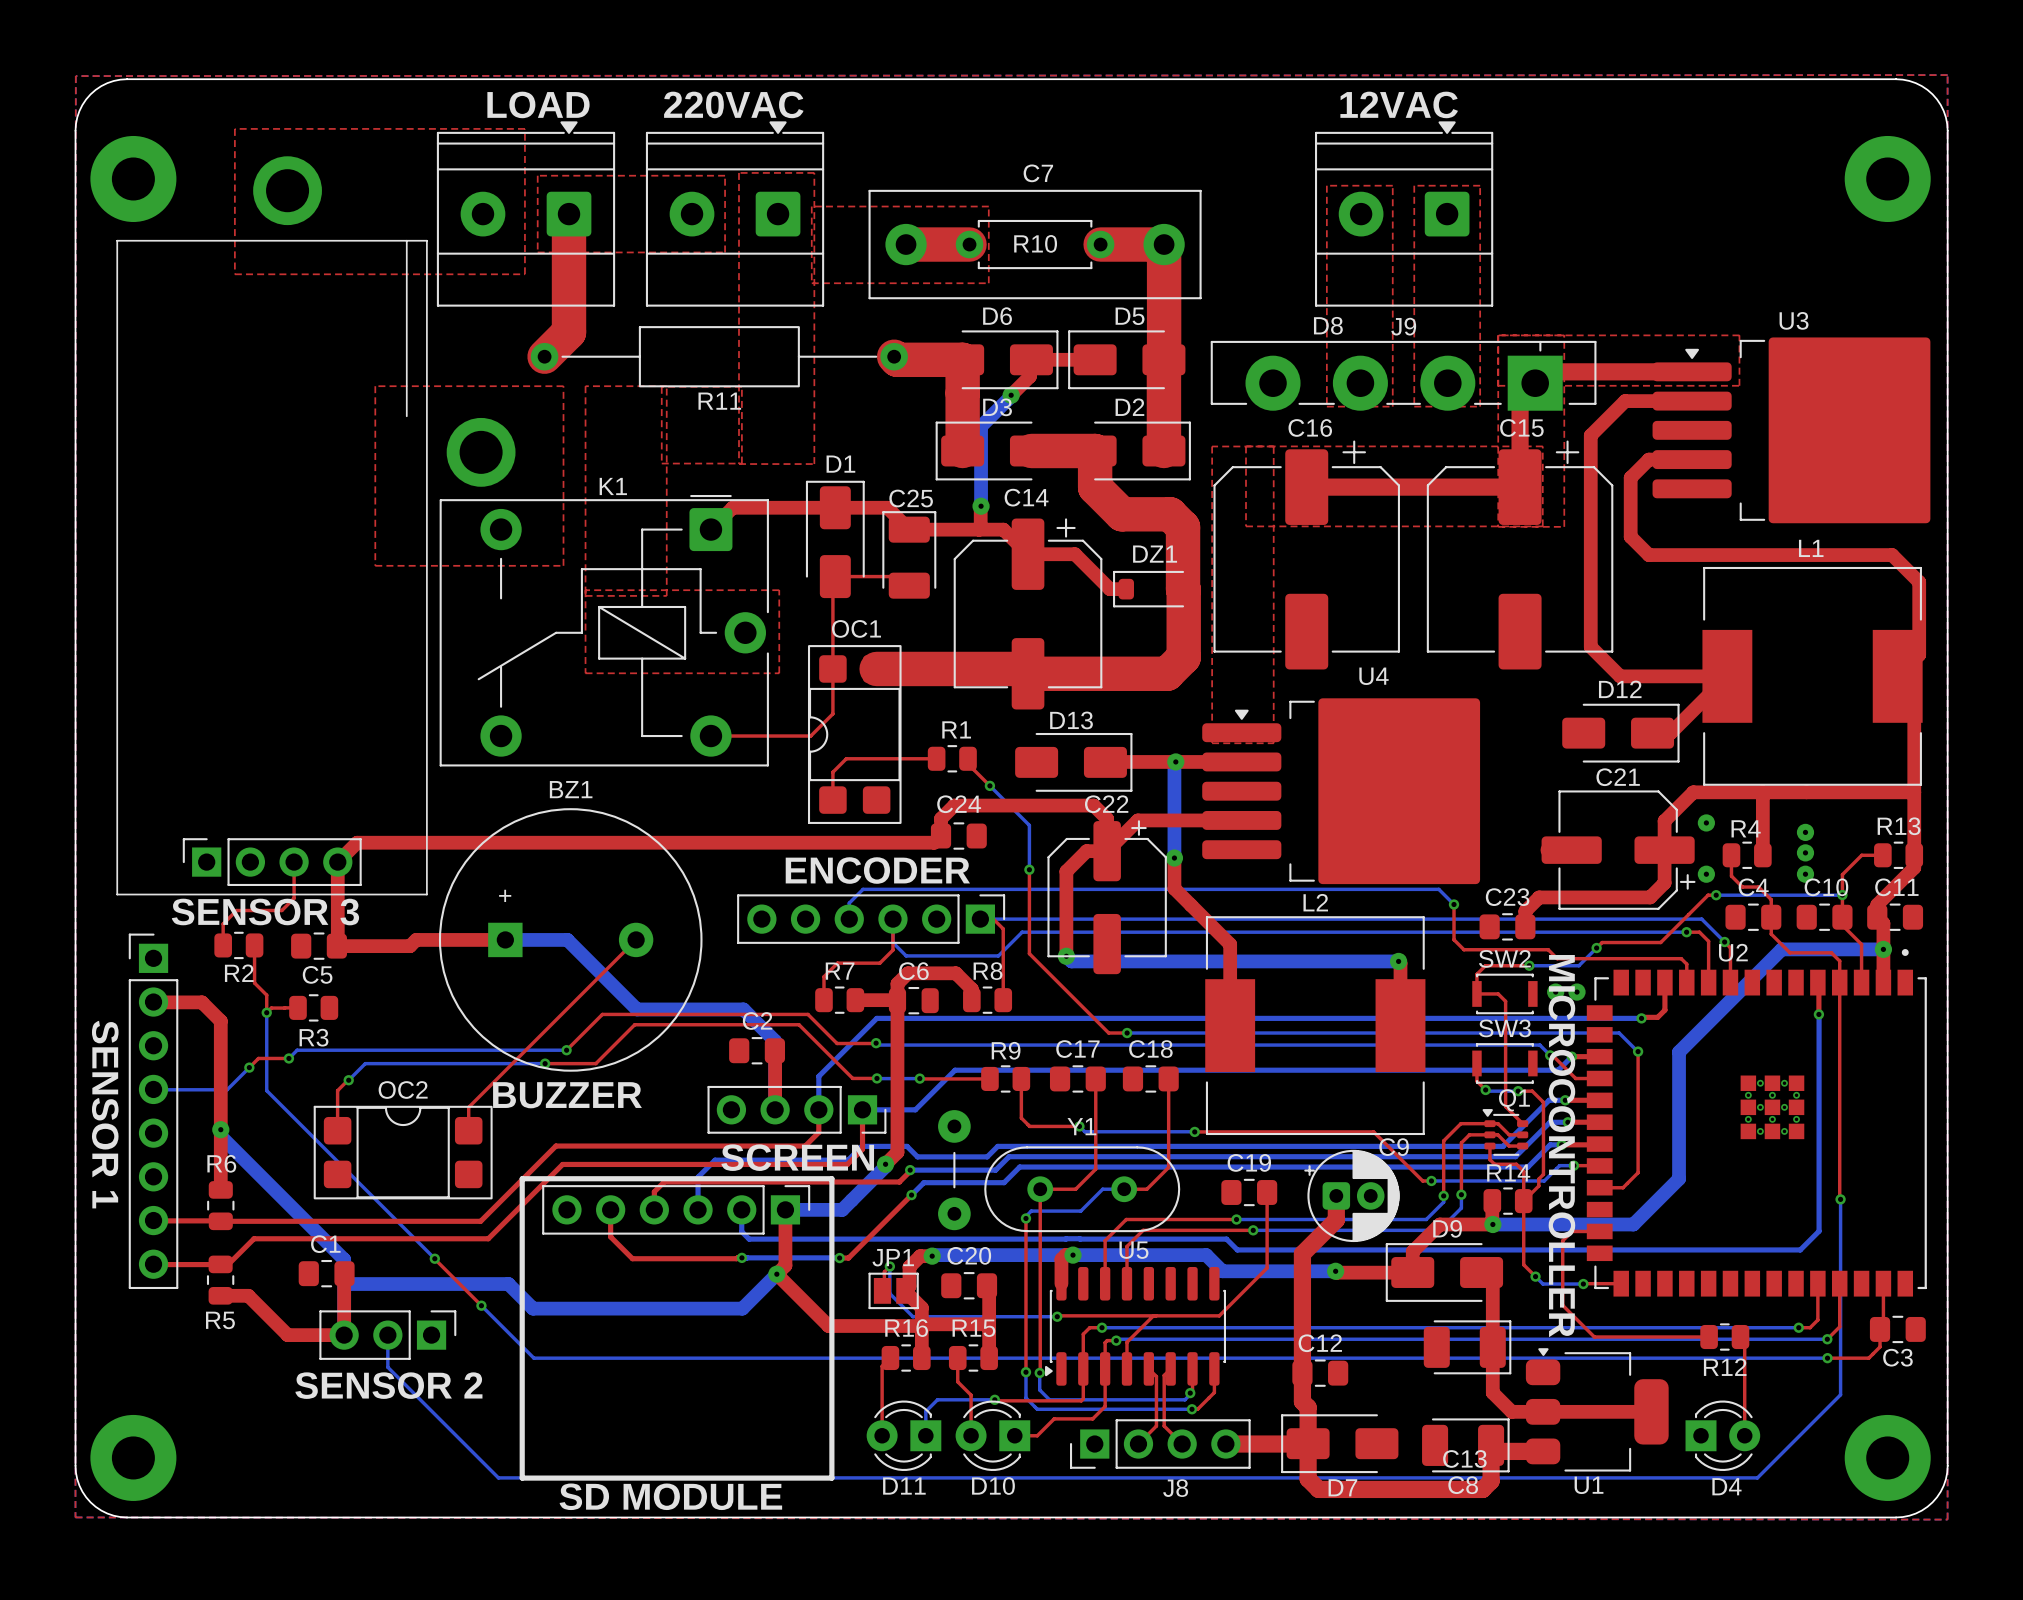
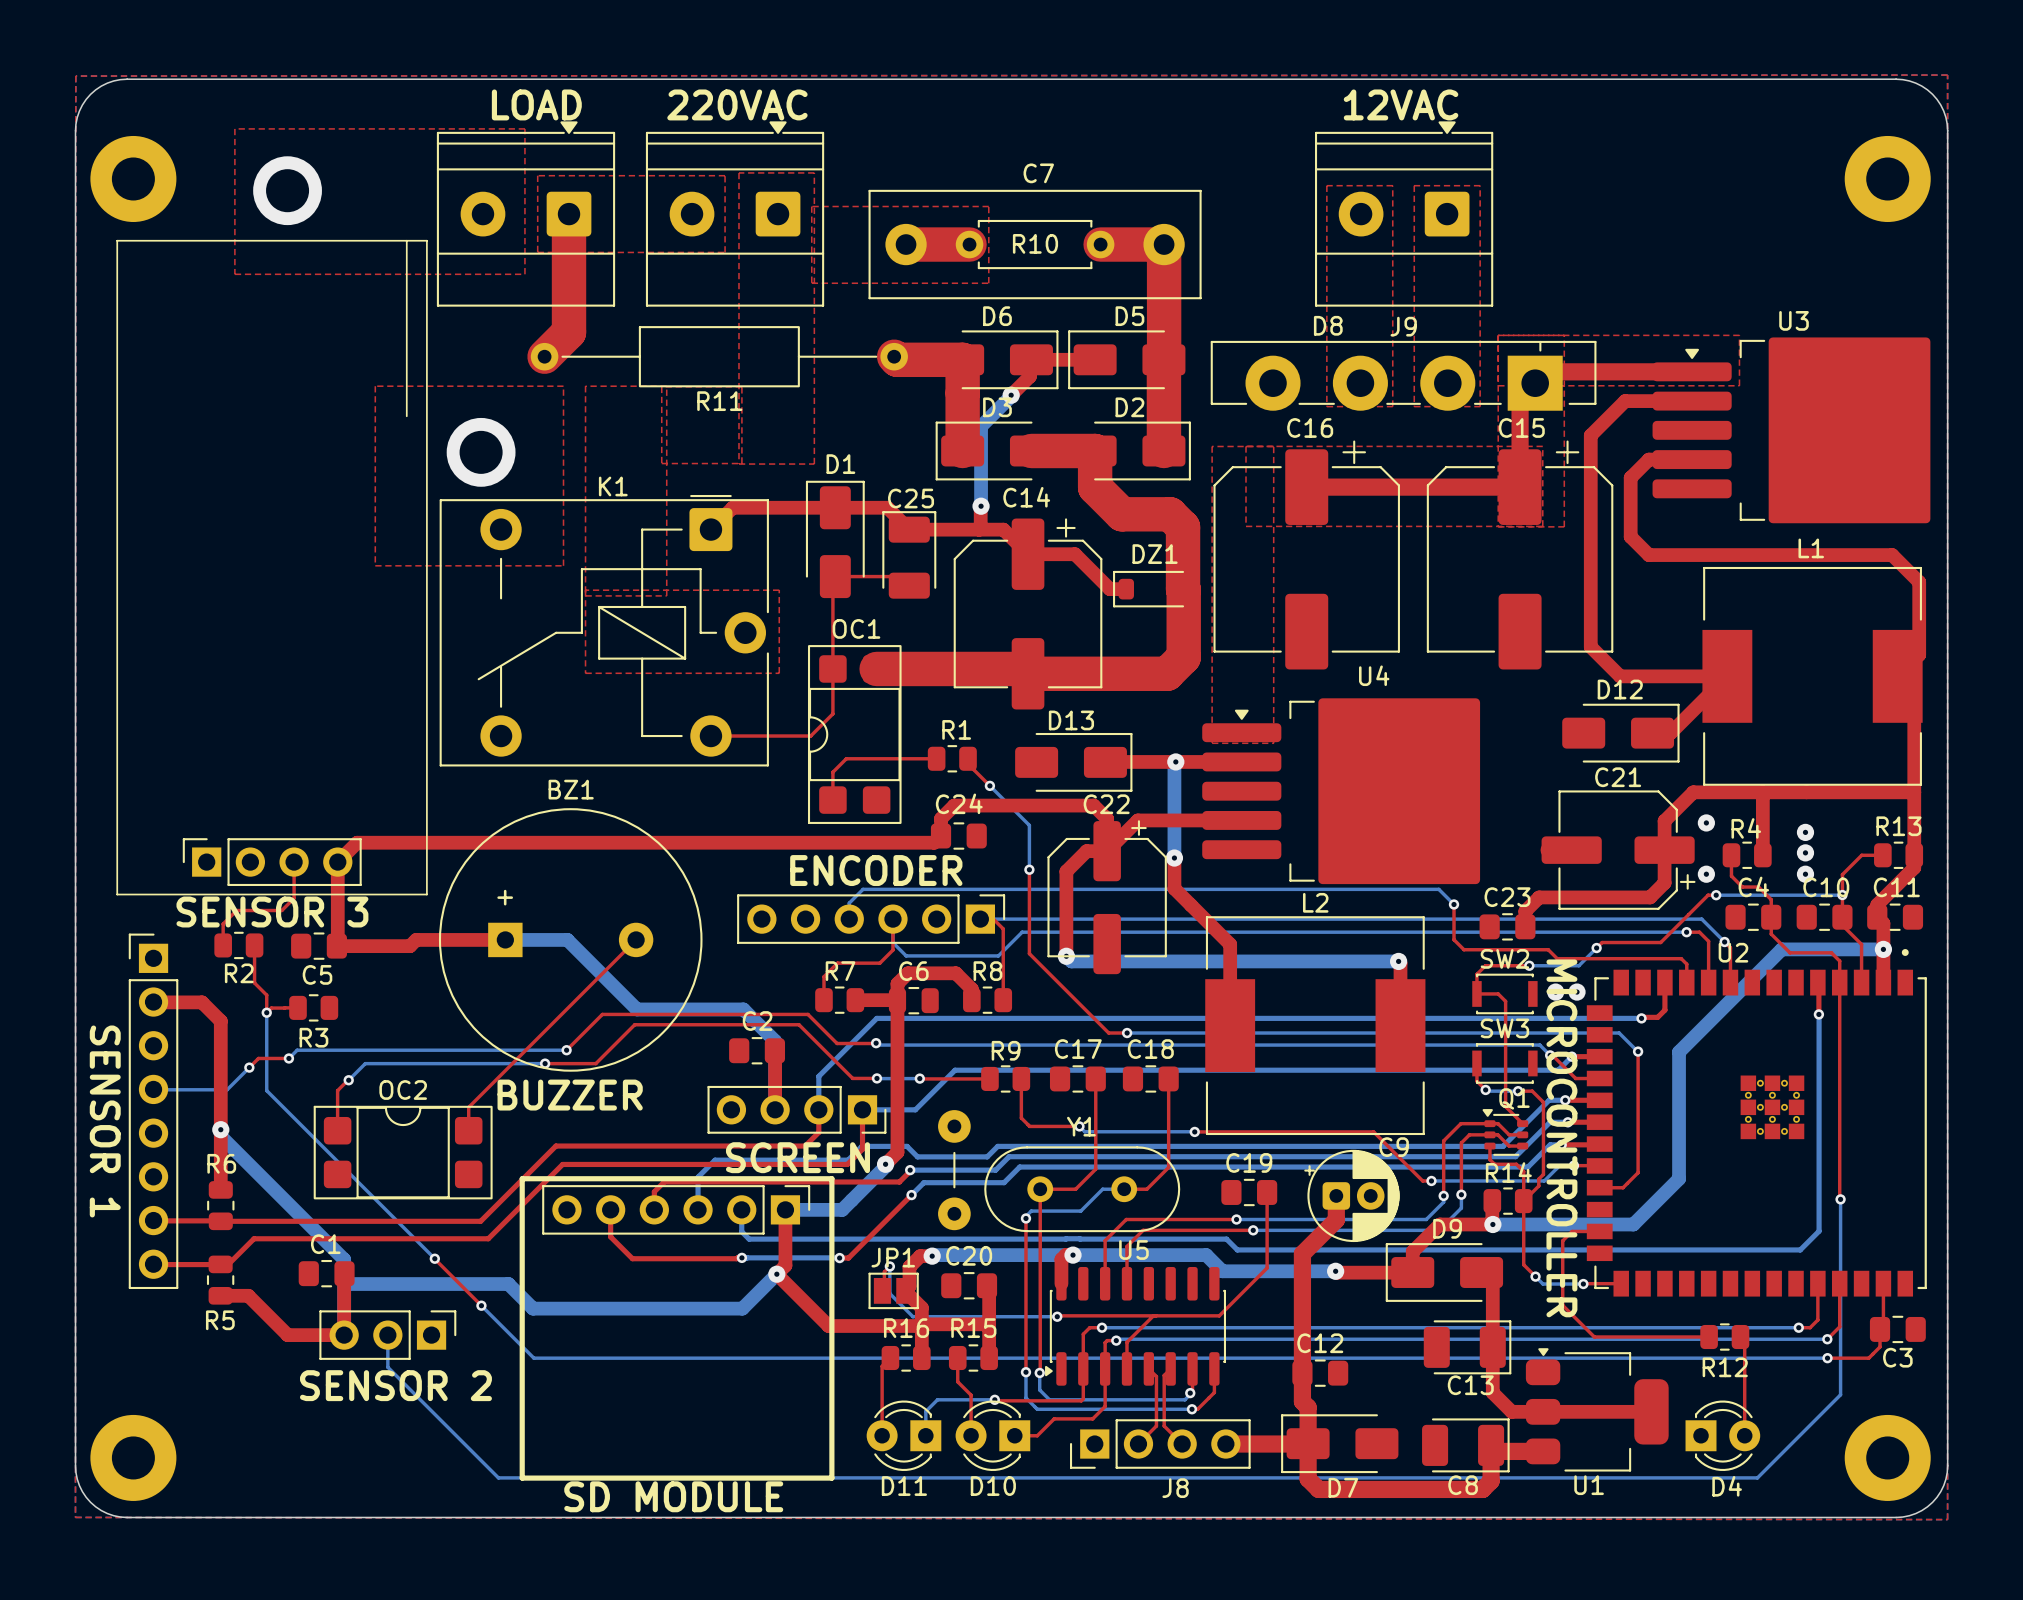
C13 name position: C13 (1464, 1458) -> C13 (1470, 1385)

